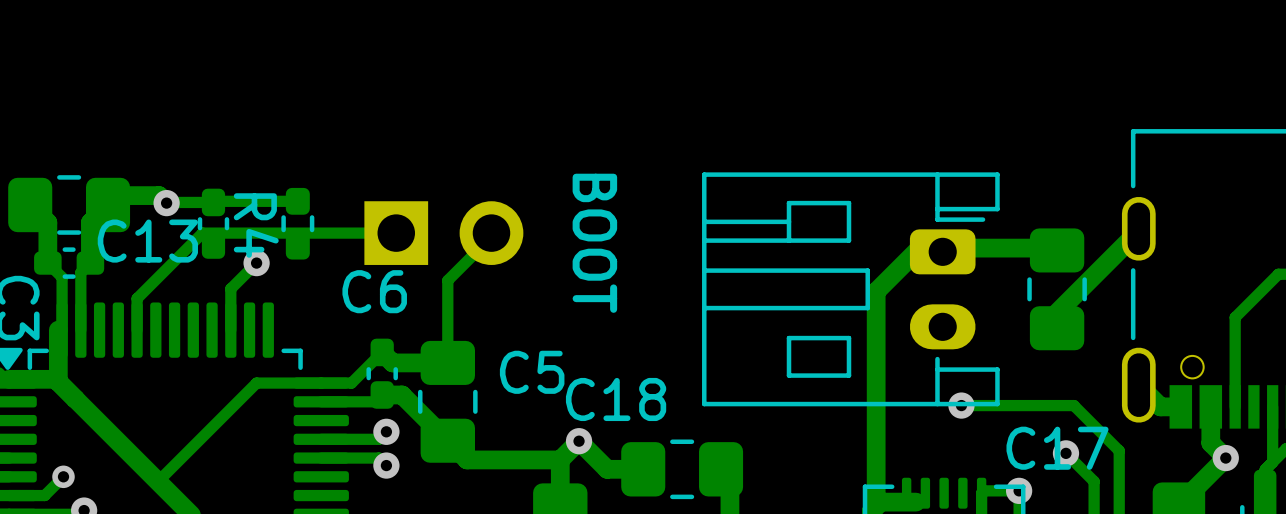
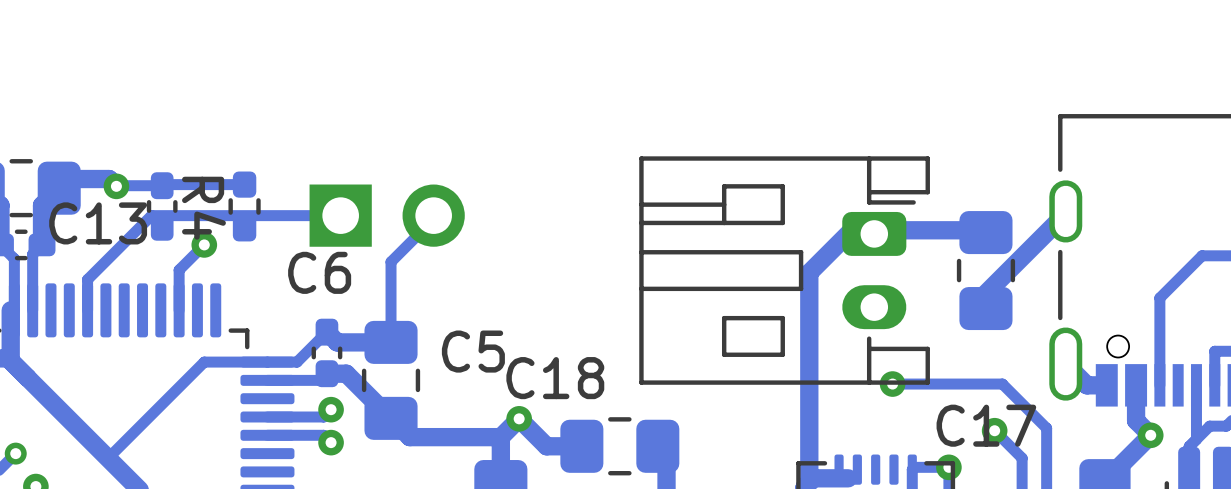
text: BOOT (594, 243) -> none

